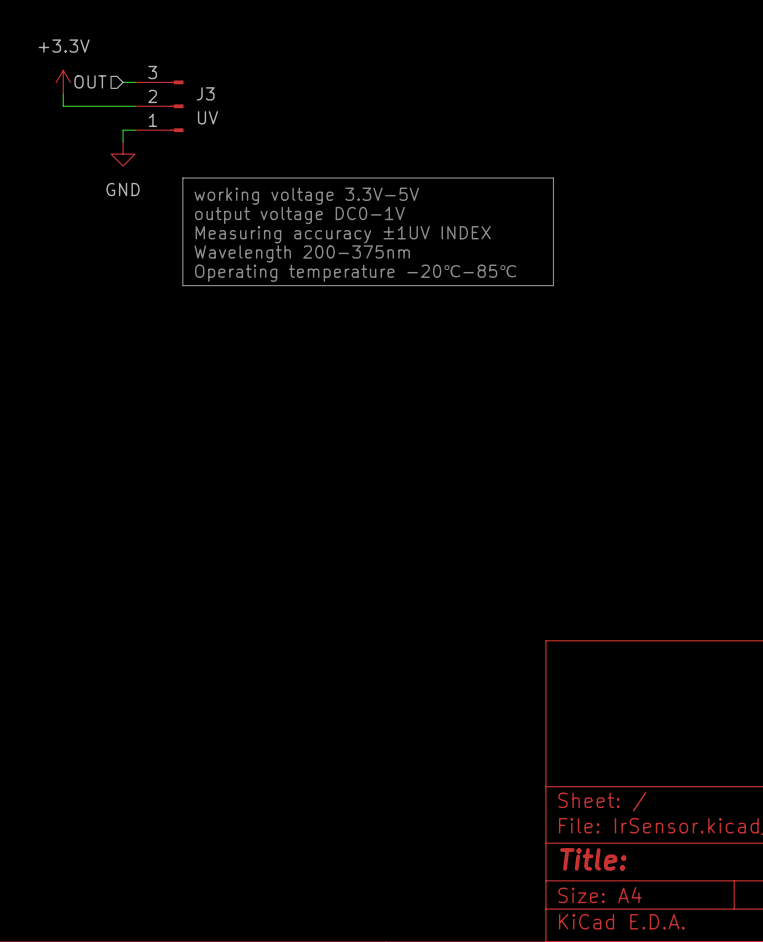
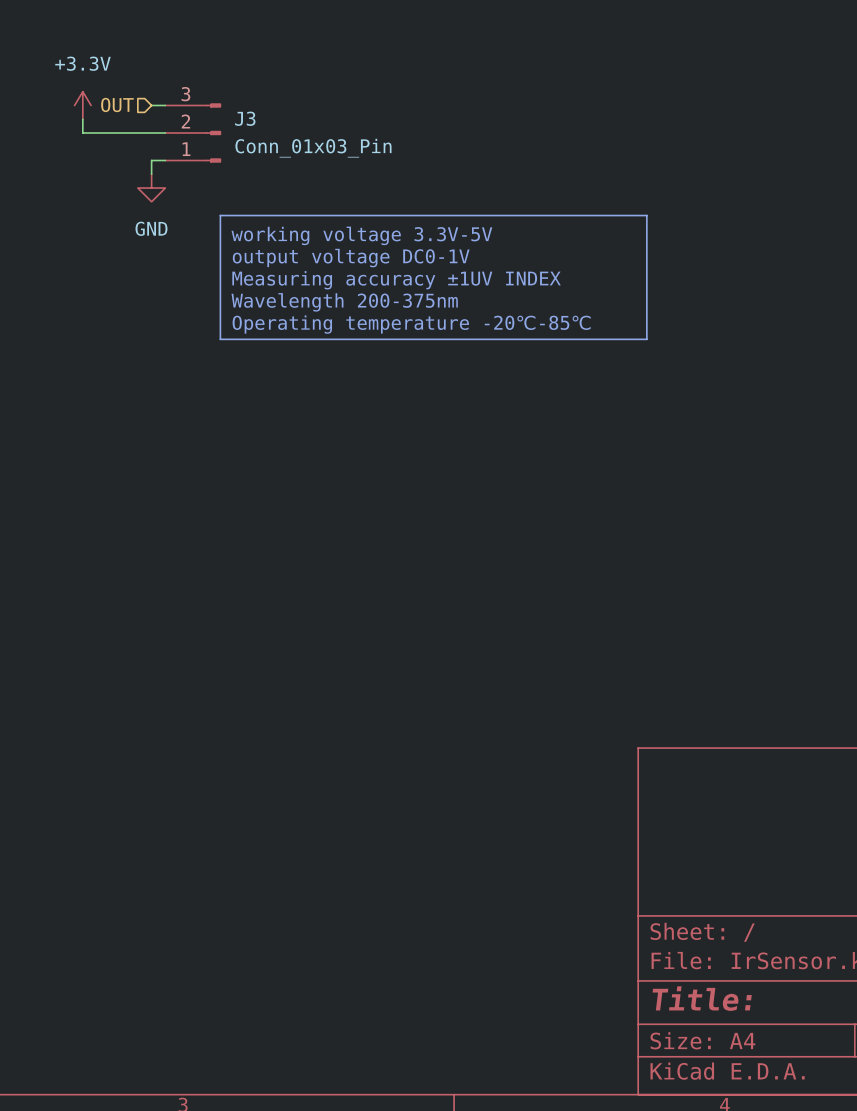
J3 value: UV (207, 117) -> Conn_01x03_Pin (313, 148)

